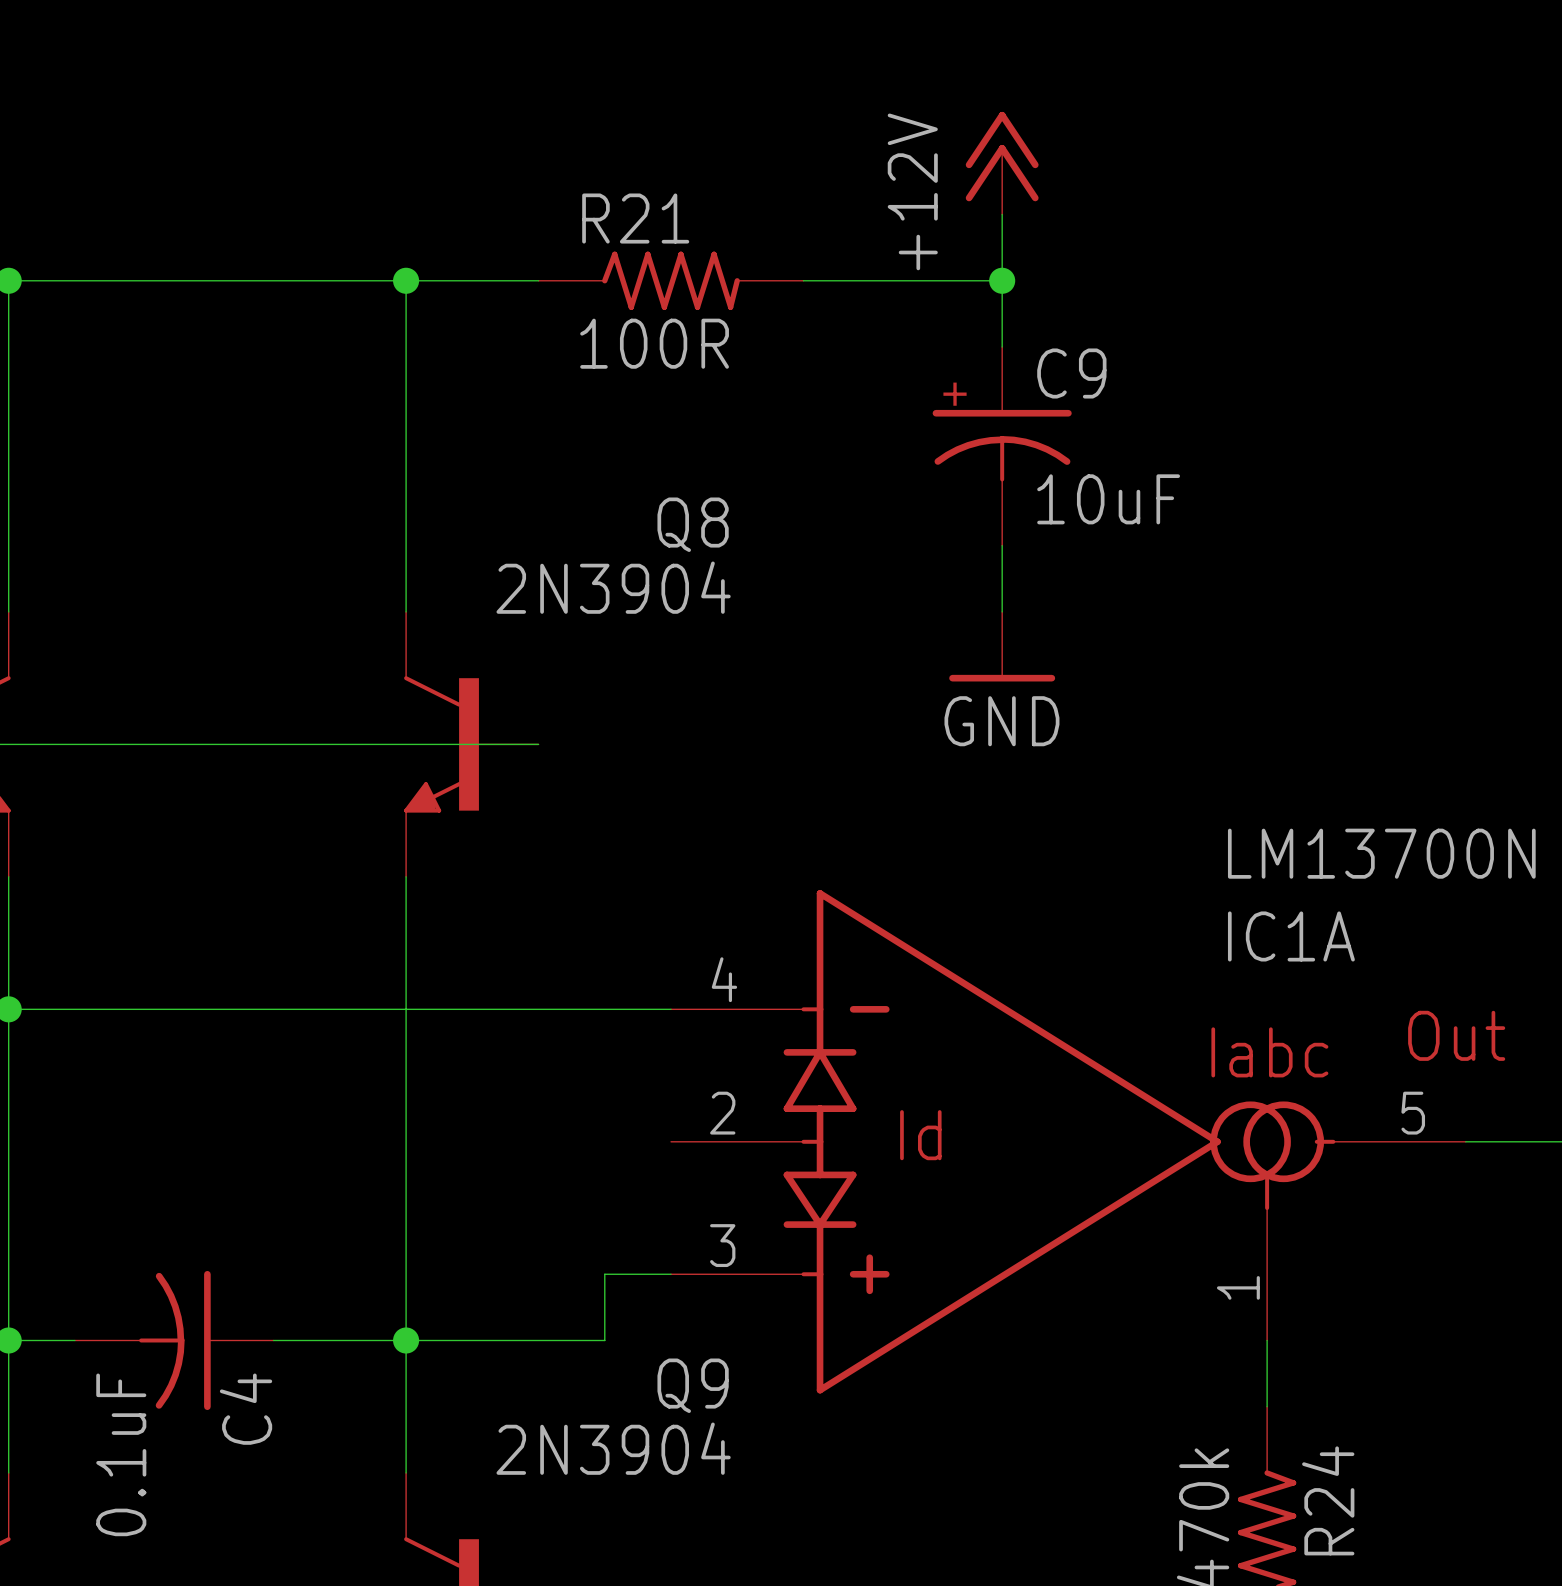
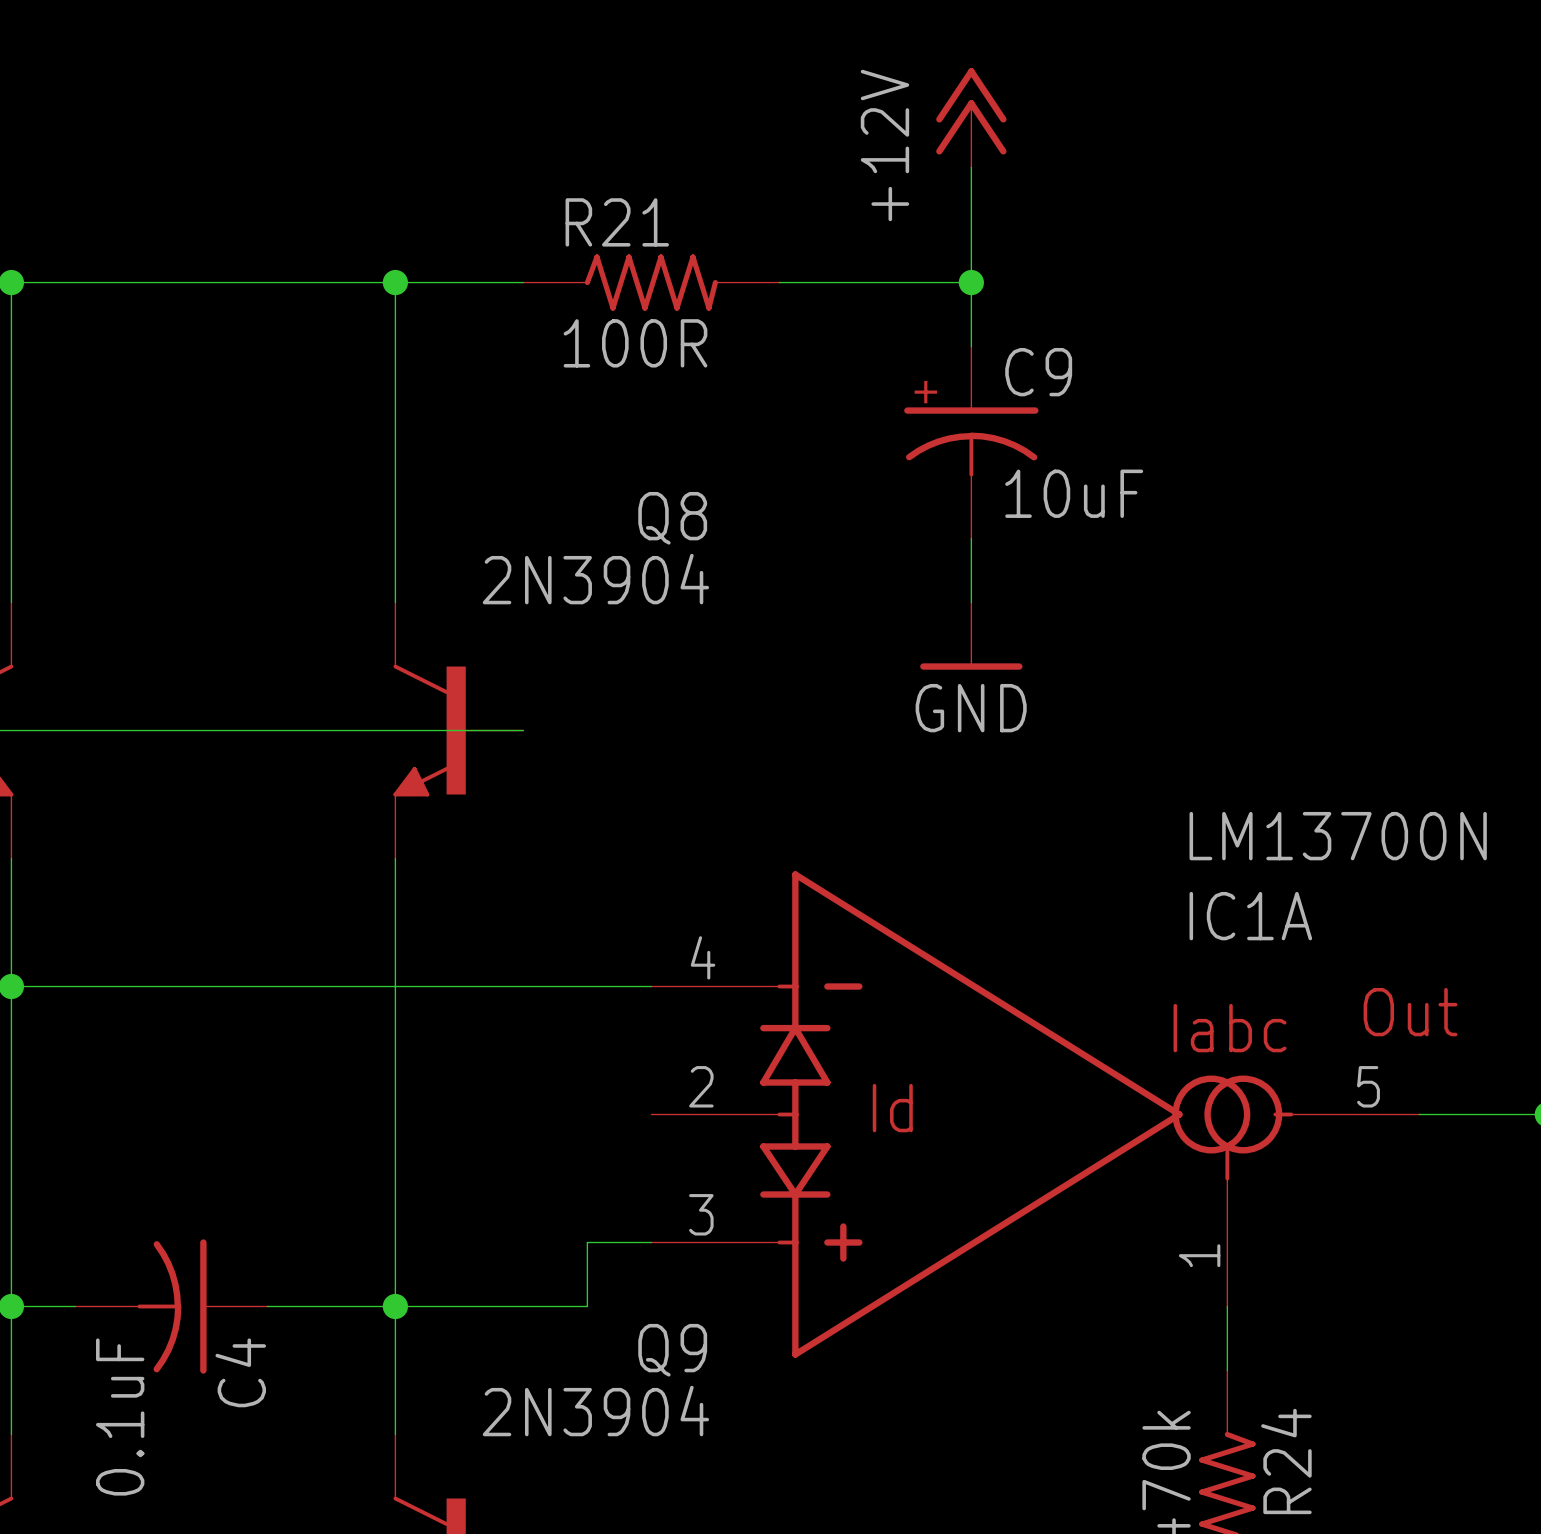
power symbol position: +12V (1002, 163) -> +12V (971, 117)

